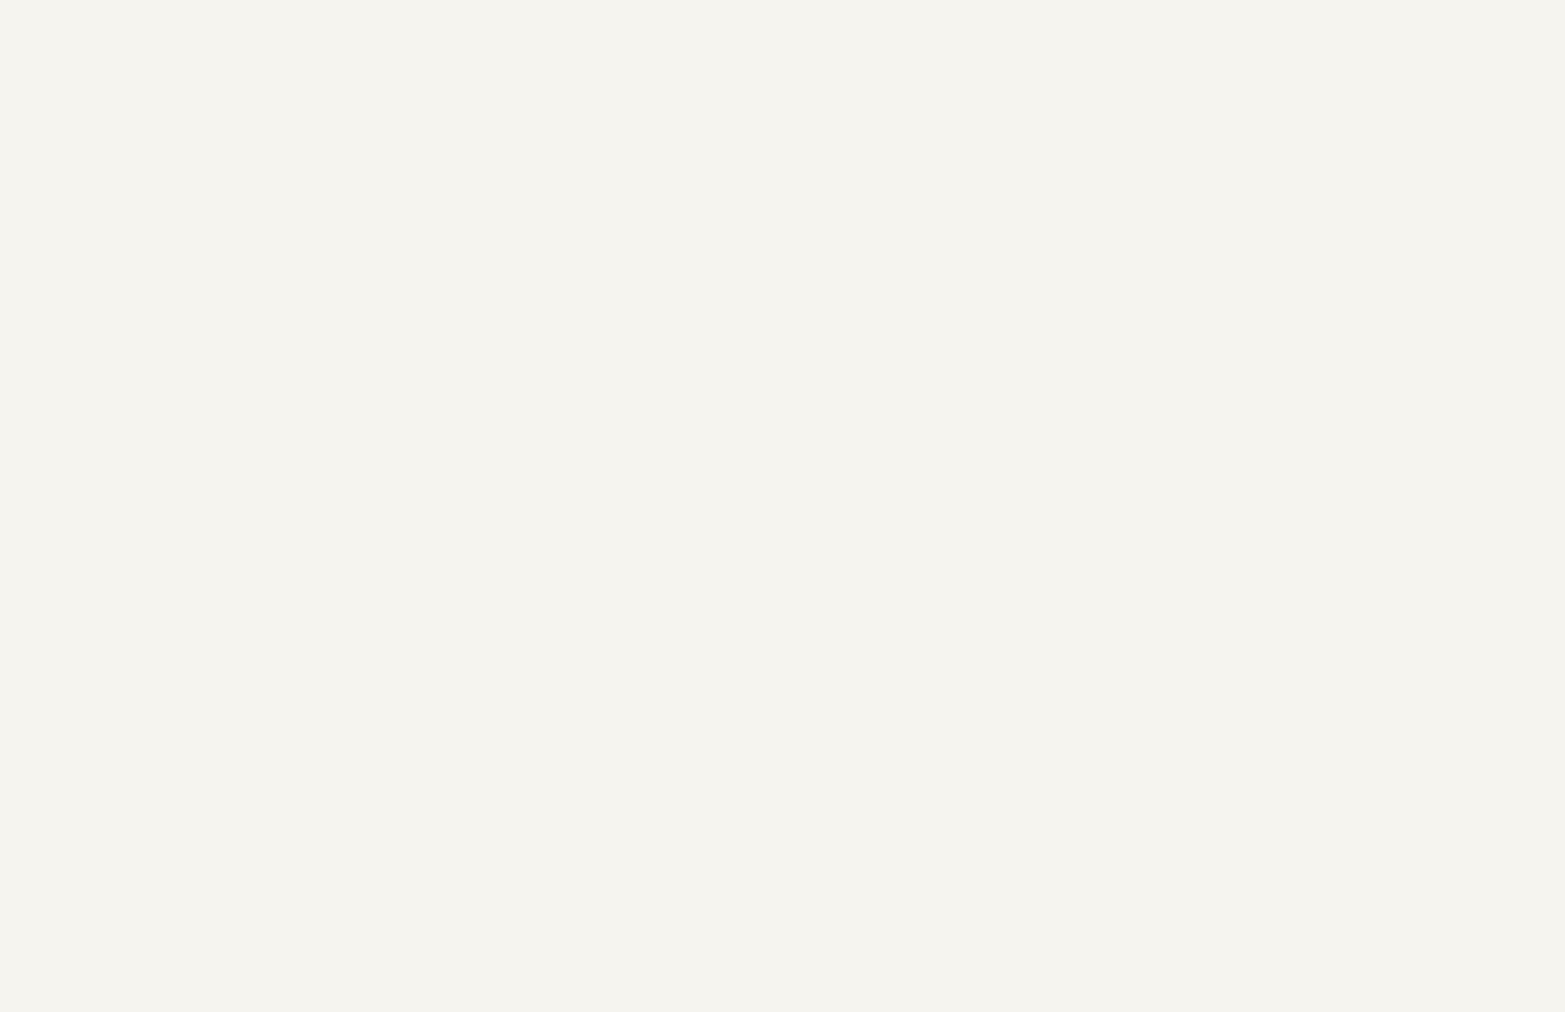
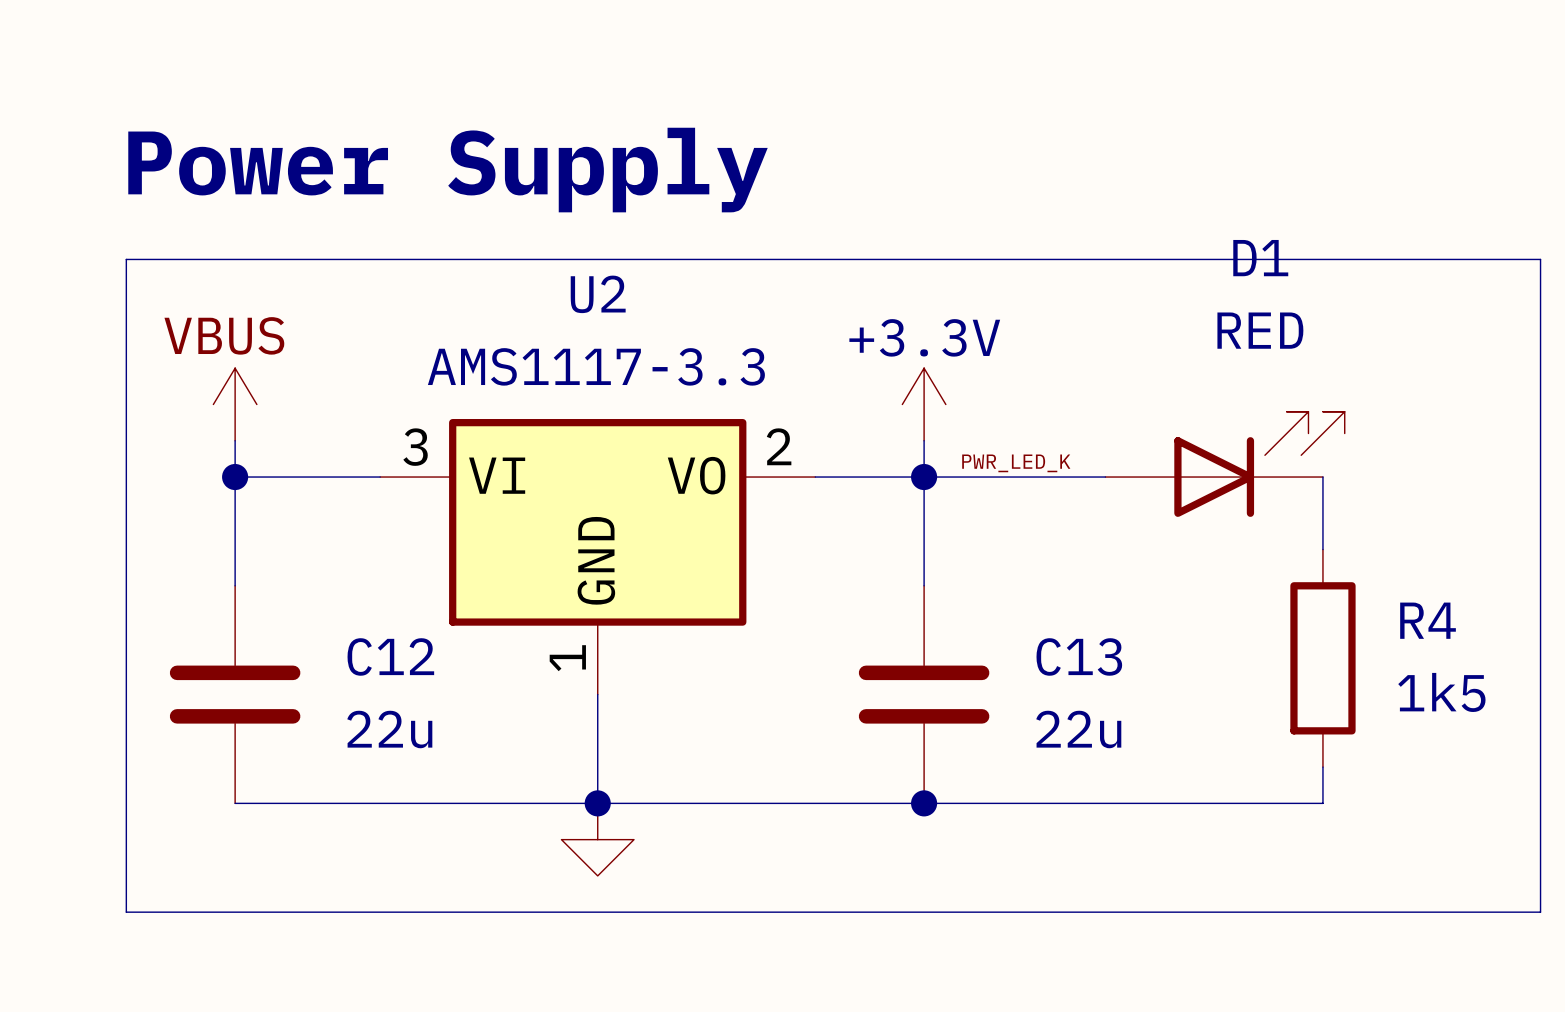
text: none -> Power Supply (447, 170)
line: none -> (126, 259) (1540, 259) (1540, 912) (126, 912) (126, 259)
label: none -> VBUS (224, 335)
power symbol: none -> (235, 404)
power symbol: none -> +3.3V (924, 404)
wire: none -> (235, 440) (235, 585)
wire: none -> (924, 440) (924, 585)
label: none -> PWR_LED_K (1016, 463)
D1: none -> RED (1225, 464)
wire: none -> (235, 477) (380, 477)
junction: none -> (235, 477)
wire: none -> (815, 477) (1105, 477)
junction: none -> (924, 477)
wire: none -> (1322, 477) (1322, 549)
U2: none -> AMS1117-3.3 (597, 556)
R4: none -> 1k5 (1322, 658)
C12: none -> 22u (235, 694)
wire: none -> (597, 694) (597, 803)
C13: none -> 22u (924, 694)
wire: none -> (1322, 767) (1322, 803) (235, 803)
junction: none -> (597, 803)
junction: none -> (924, 803)
power symbol: none -> (597, 839)

